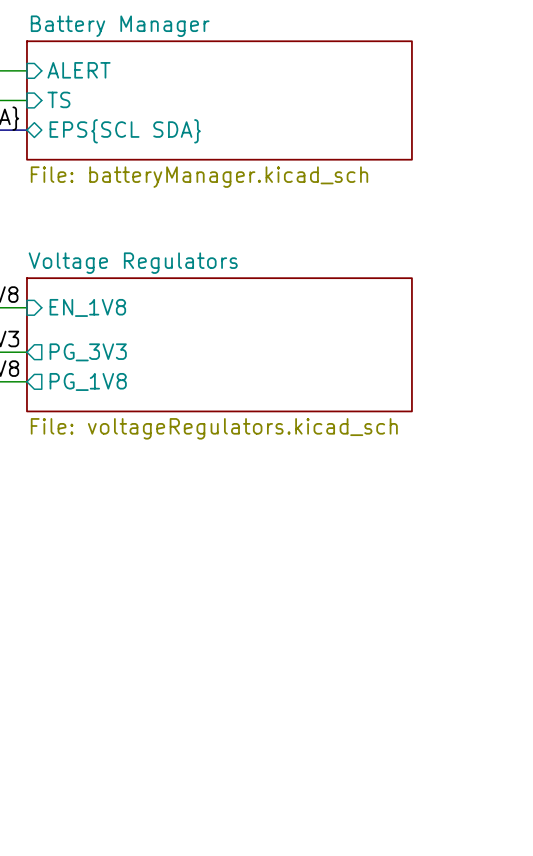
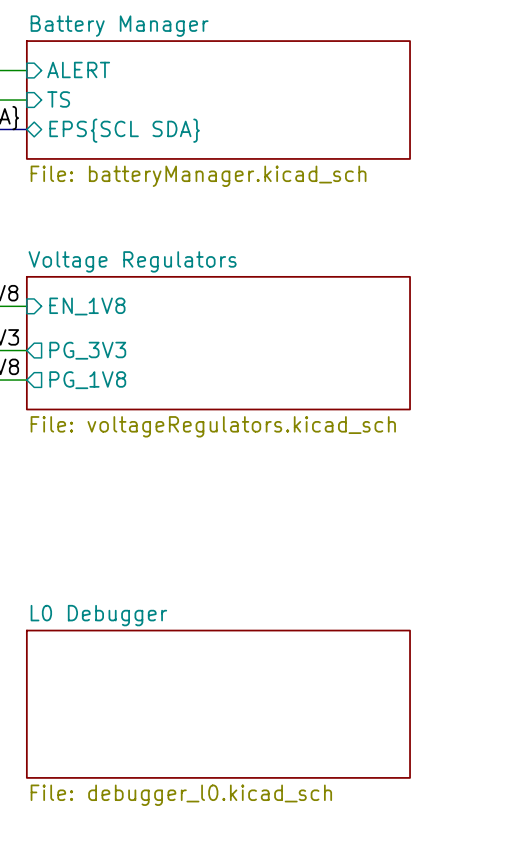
sheet L0 Debugger: none -> File: debugger_l0.kicad_sch (218, 704)

